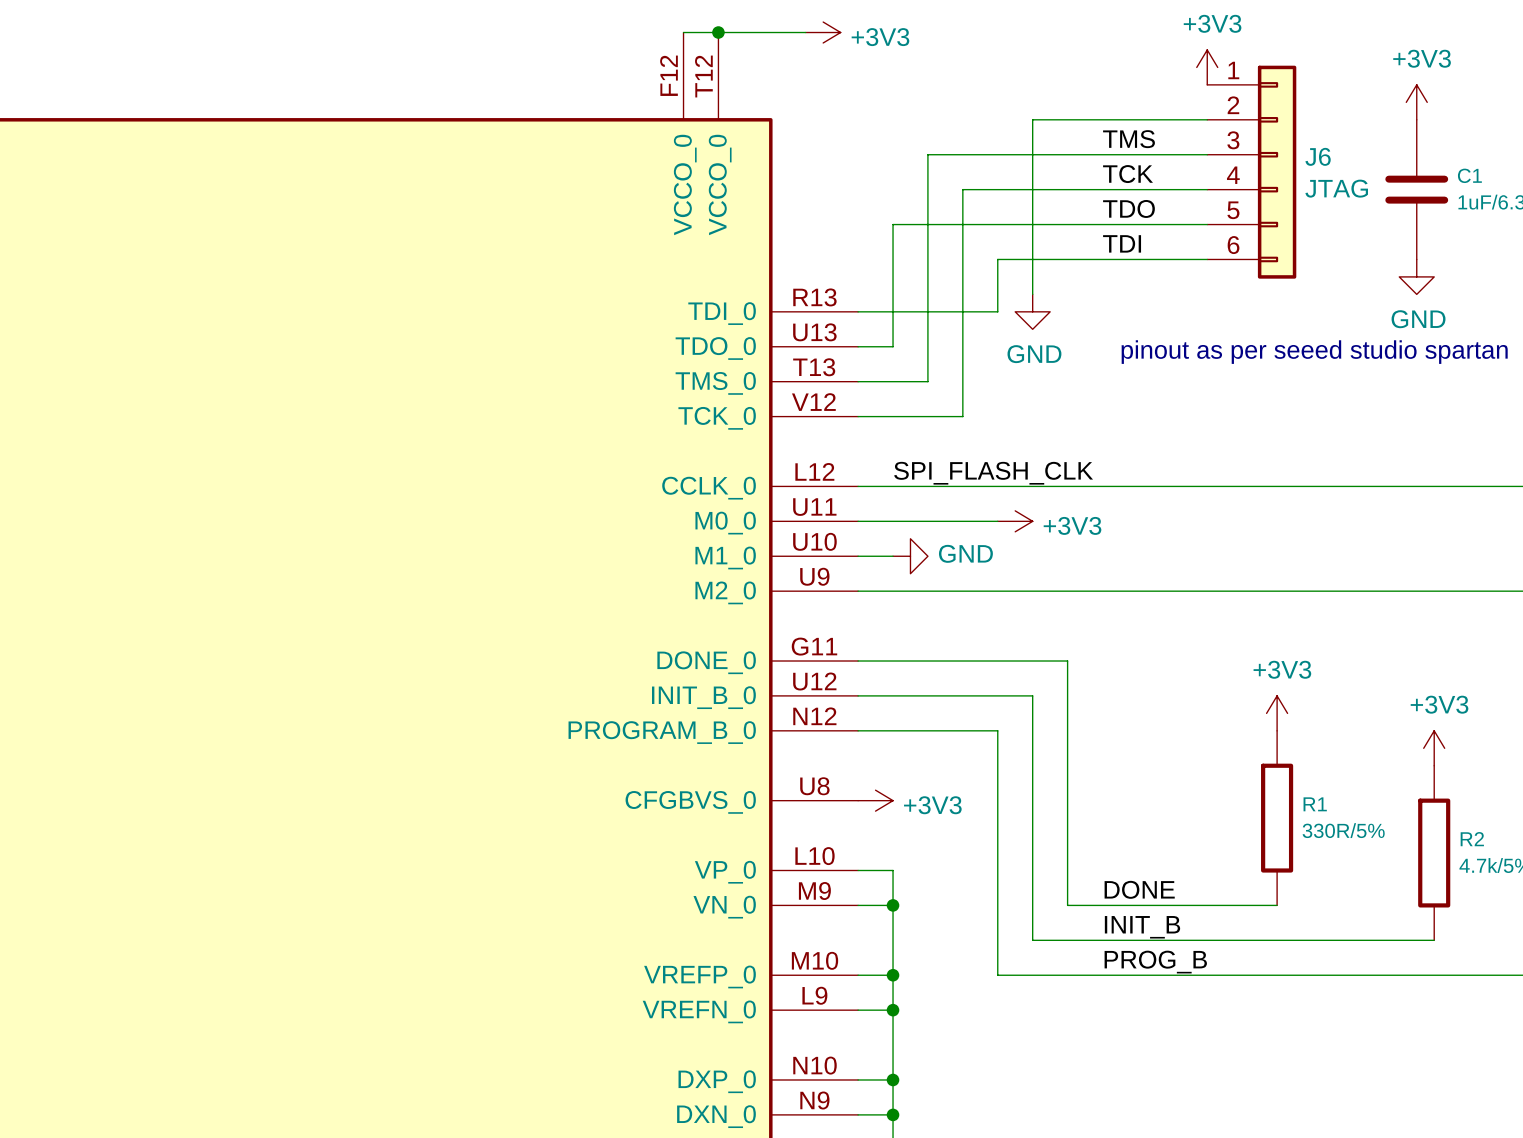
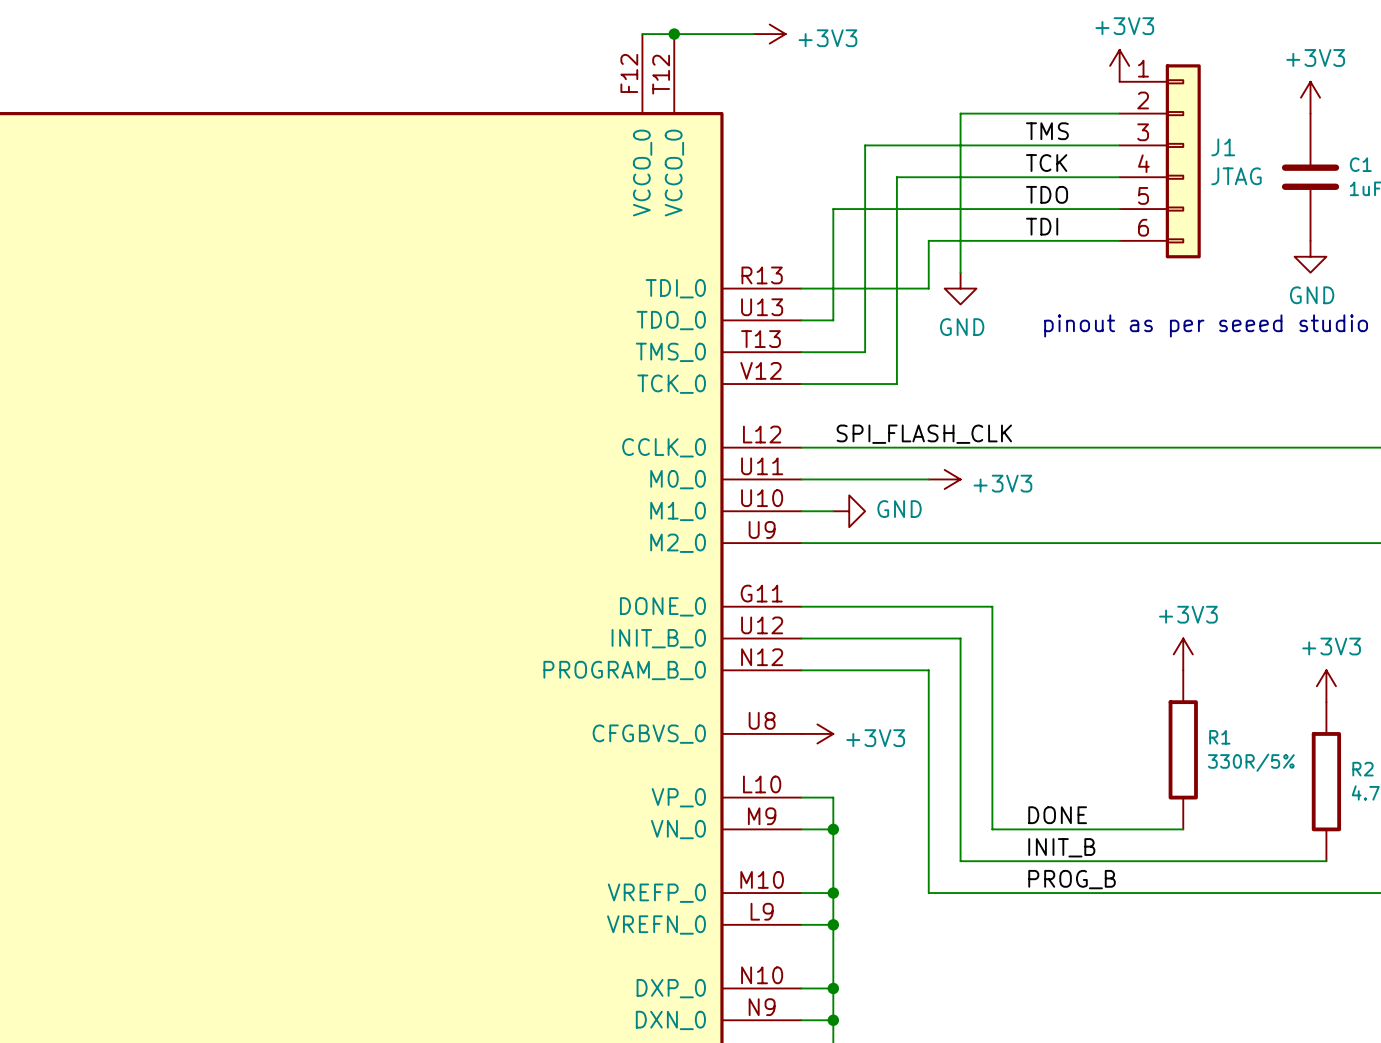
J6 name: J6 (1318, 156) -> J1 (1223, 147)

